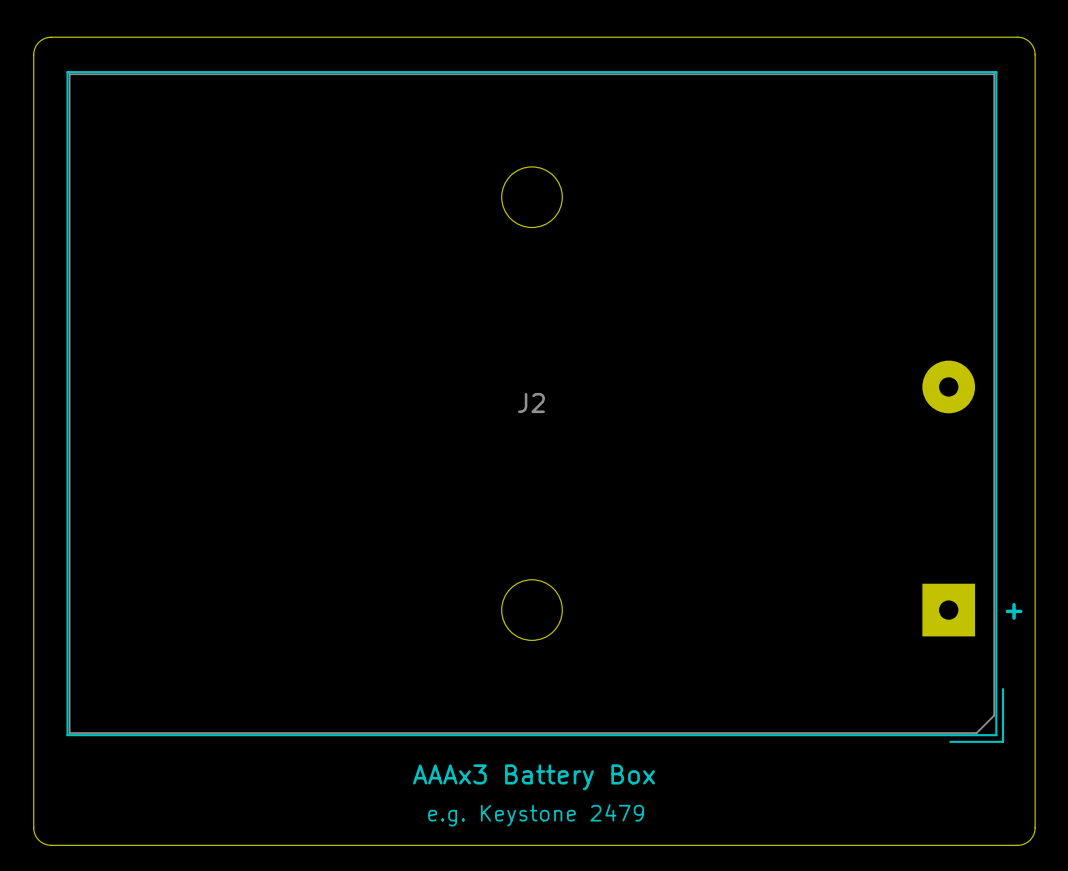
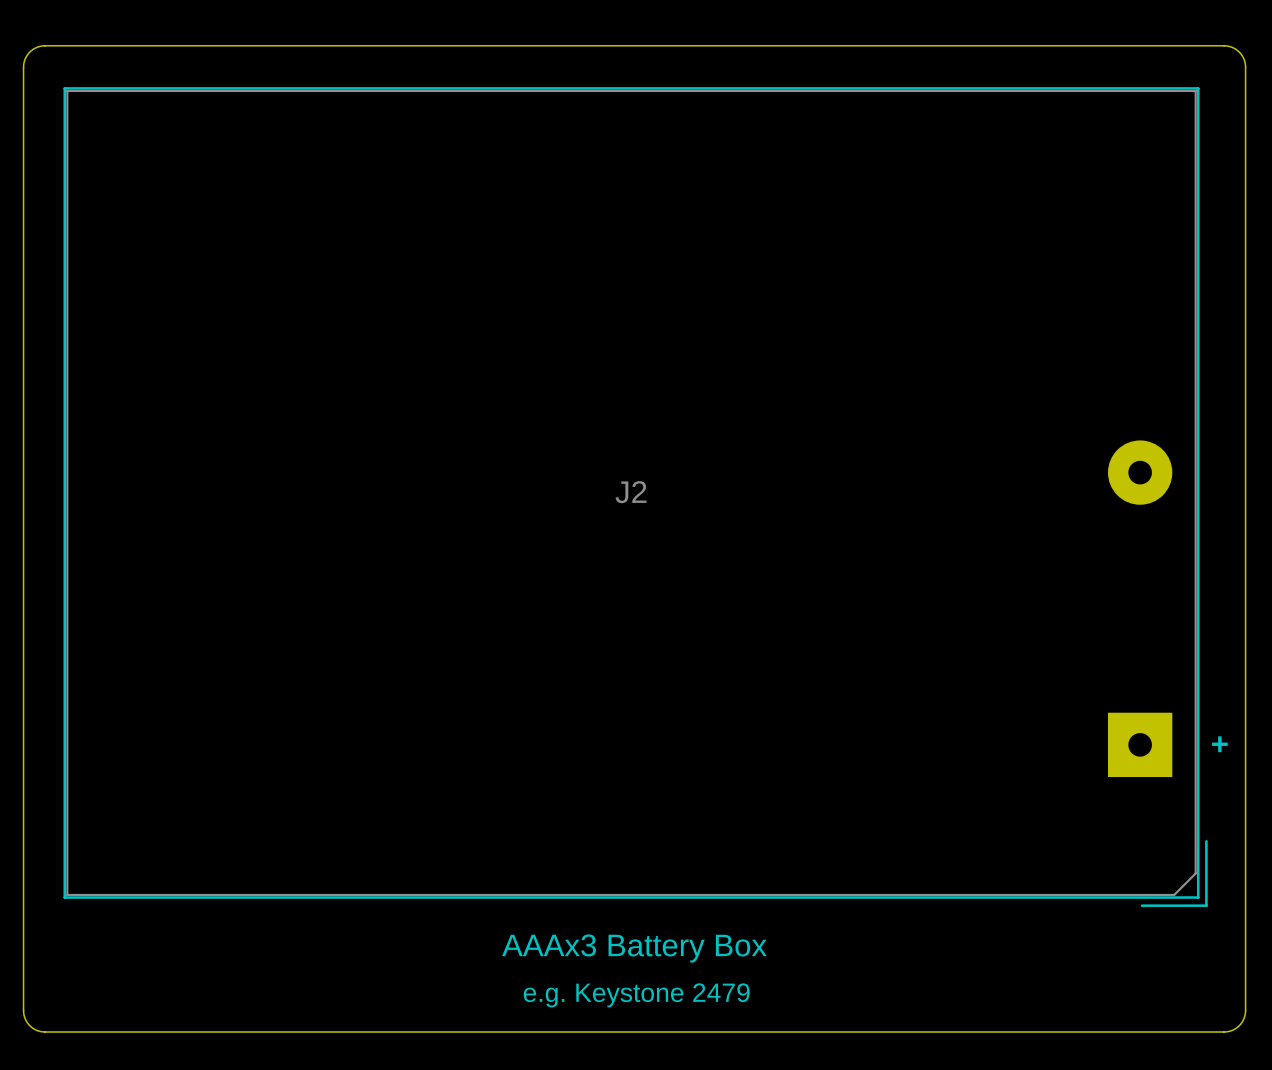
J2 footprint: [66, 71, 1005, 743] -> [63, 87, 1208, 907]

